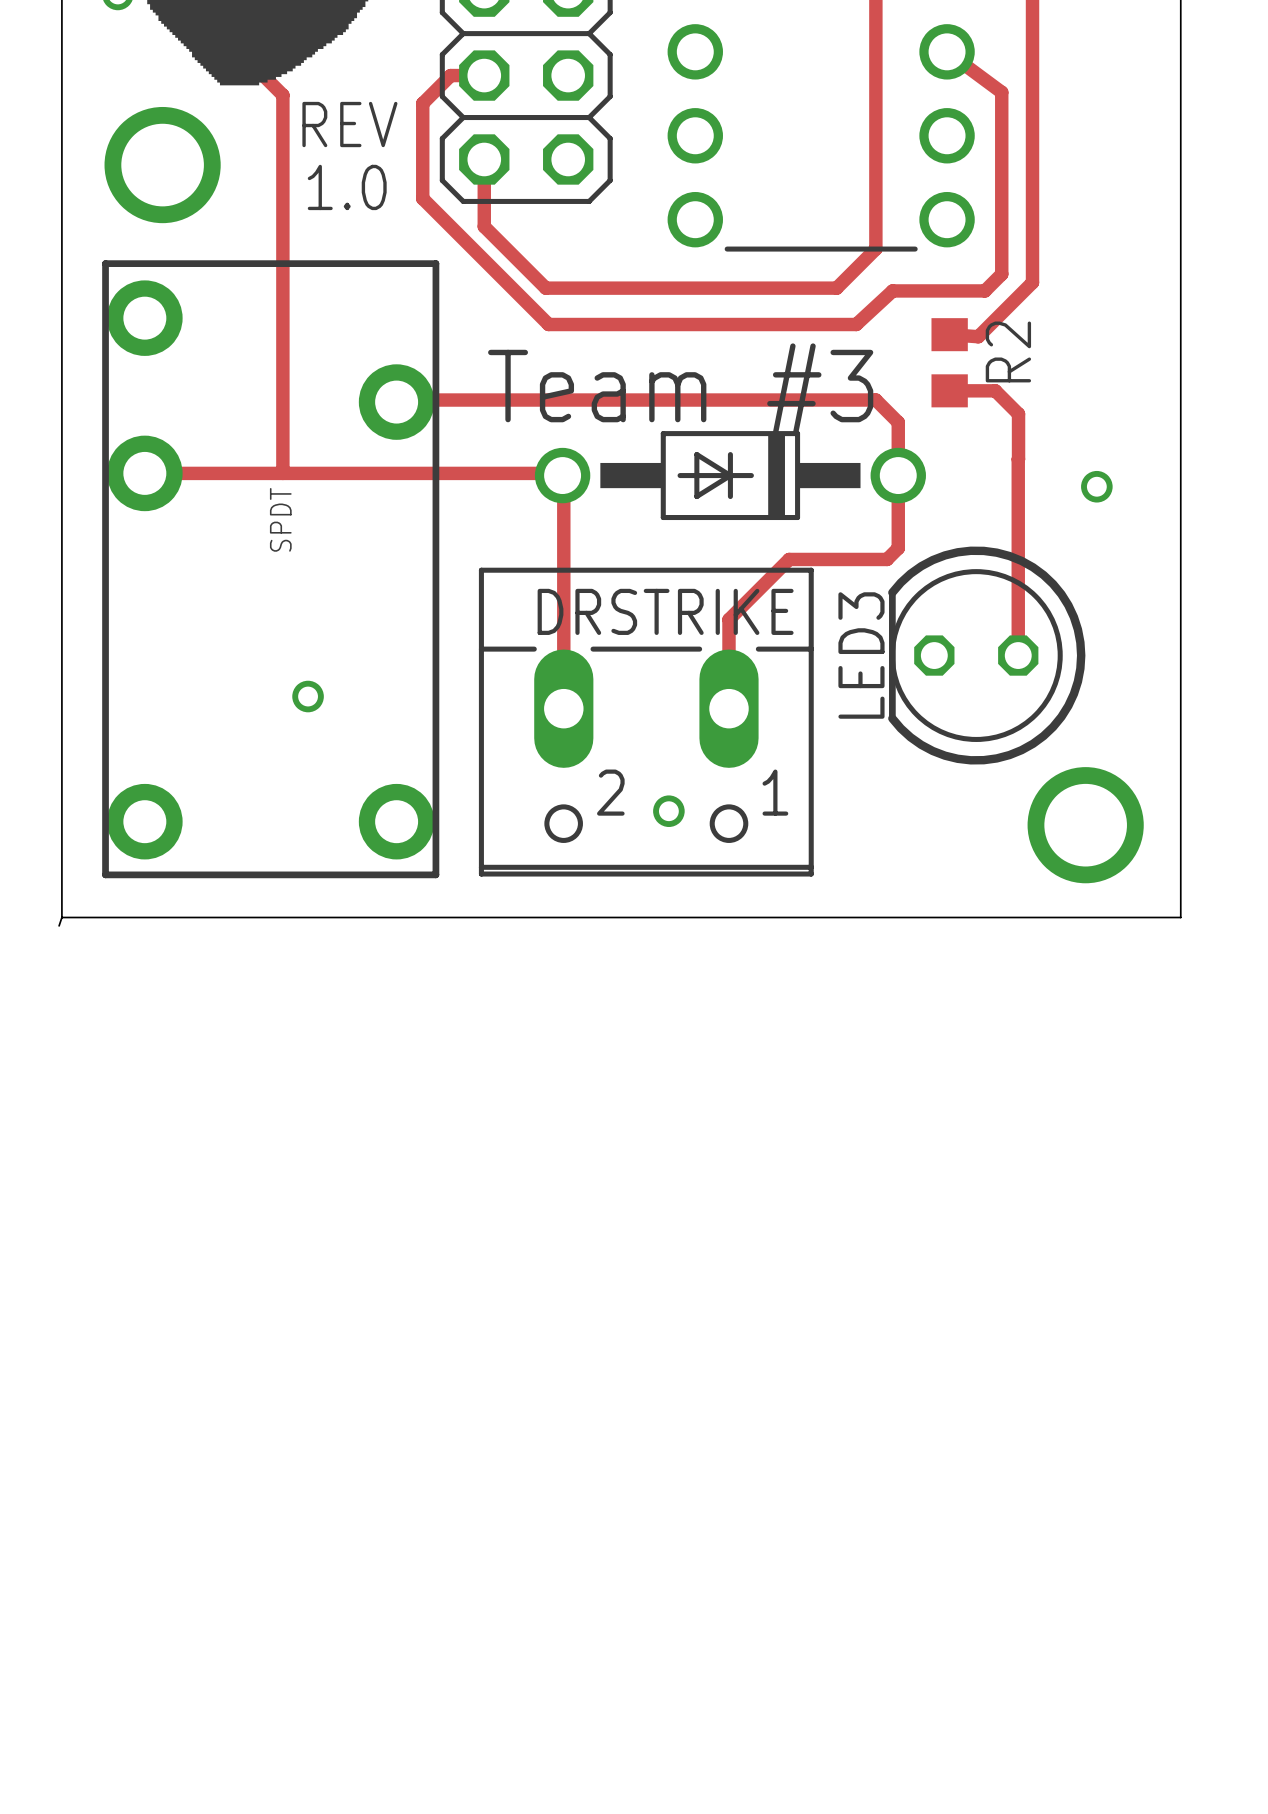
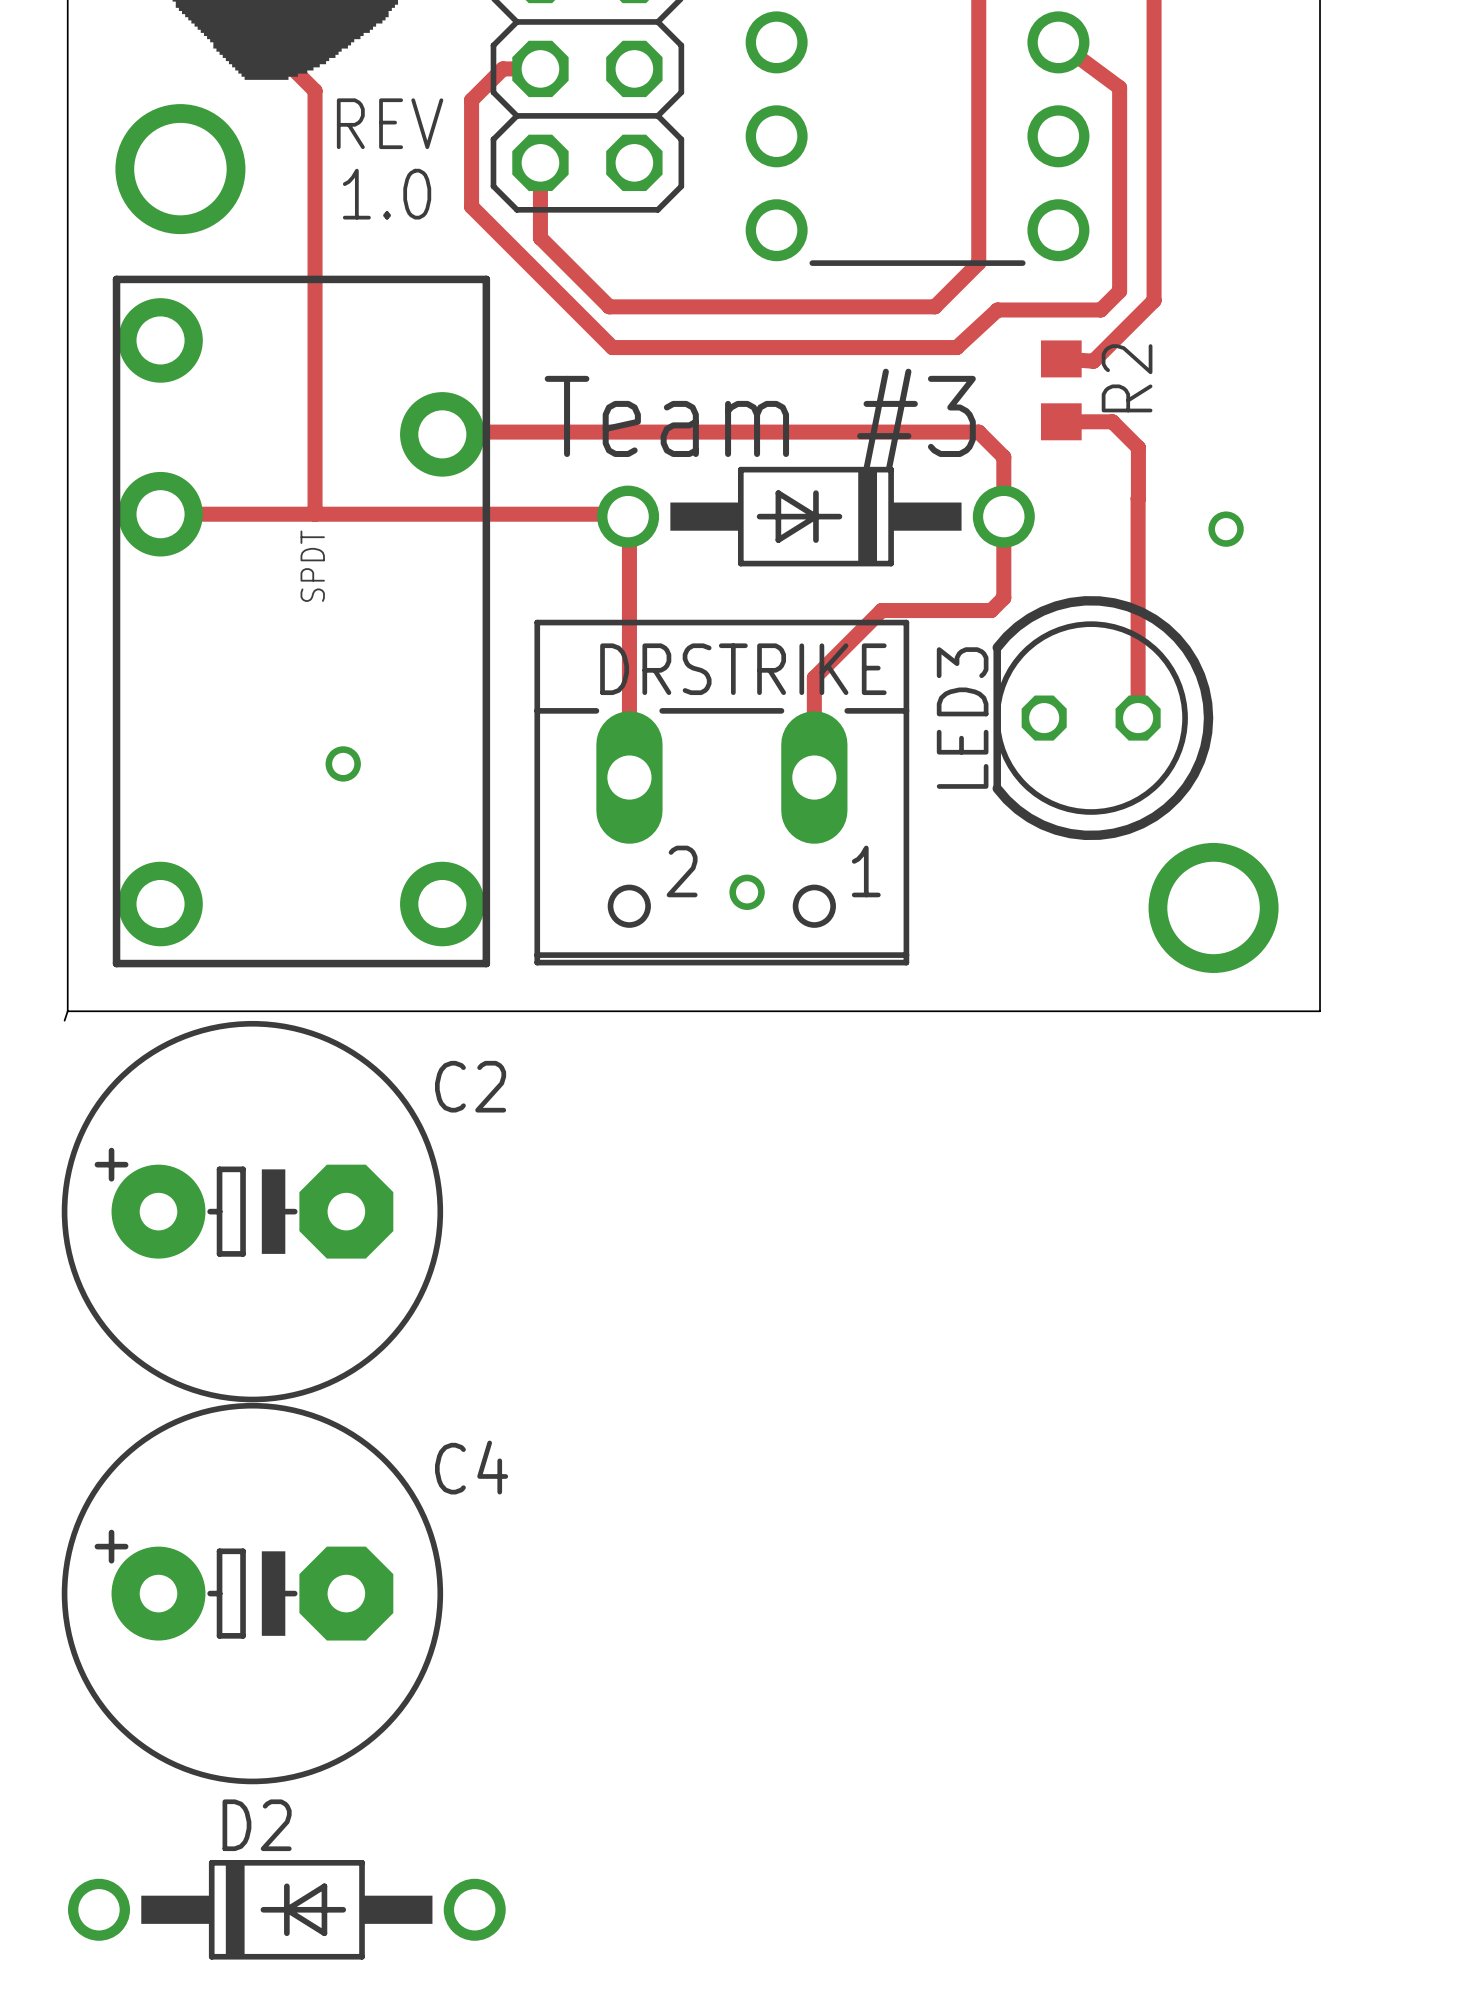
C2: none -> (252, 1211)
C4: none -> (252, 1593)
D2: none -> (286, 1909)

